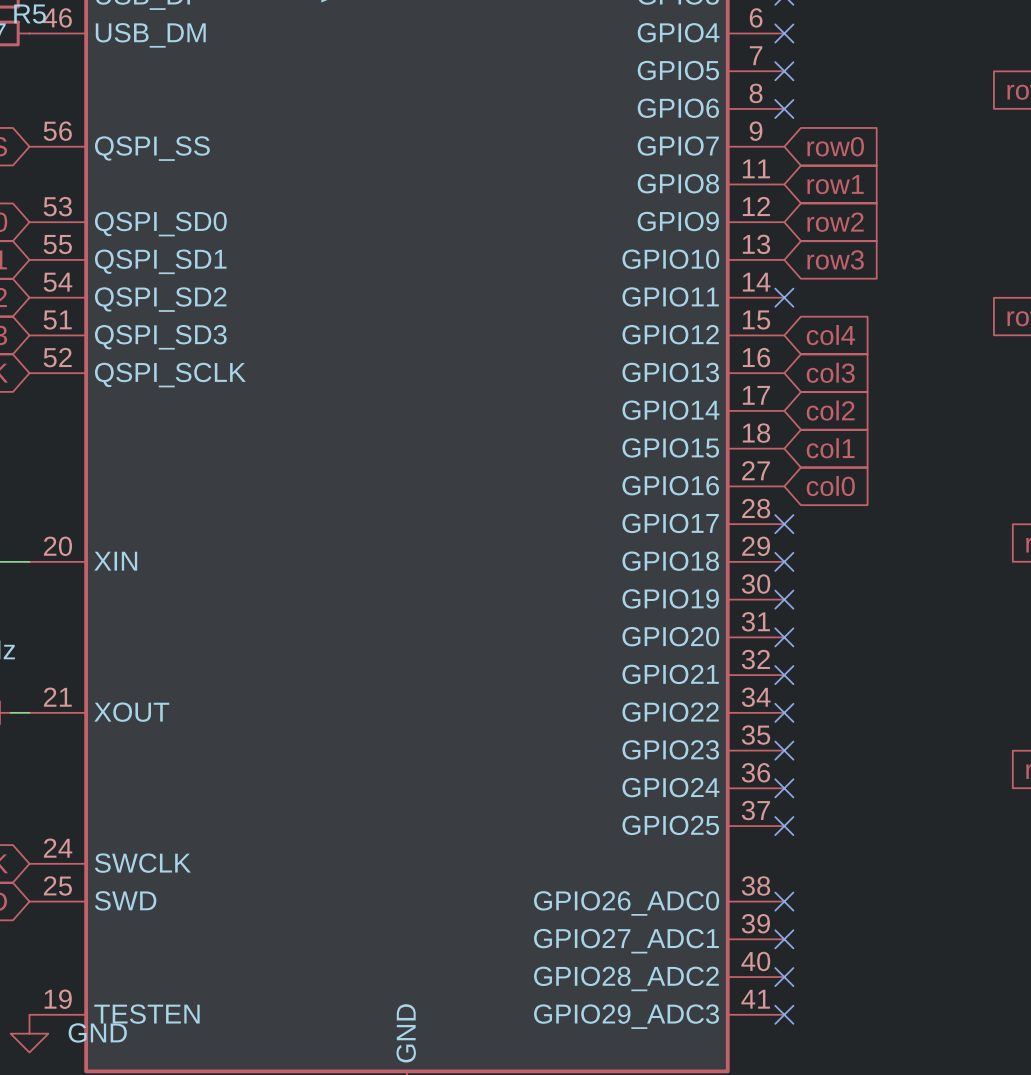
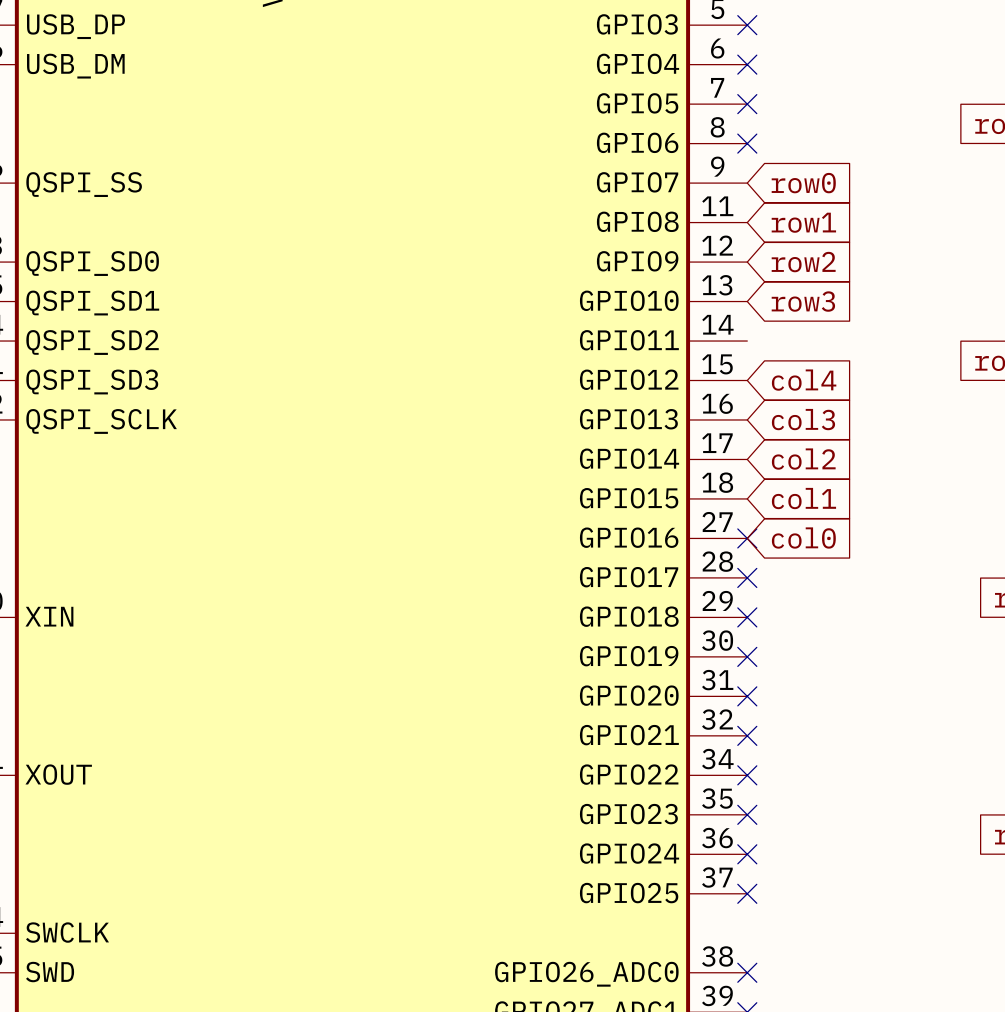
no-connect mark: (784, 297) -> none
no-connect mark: none -> (747, 538)

